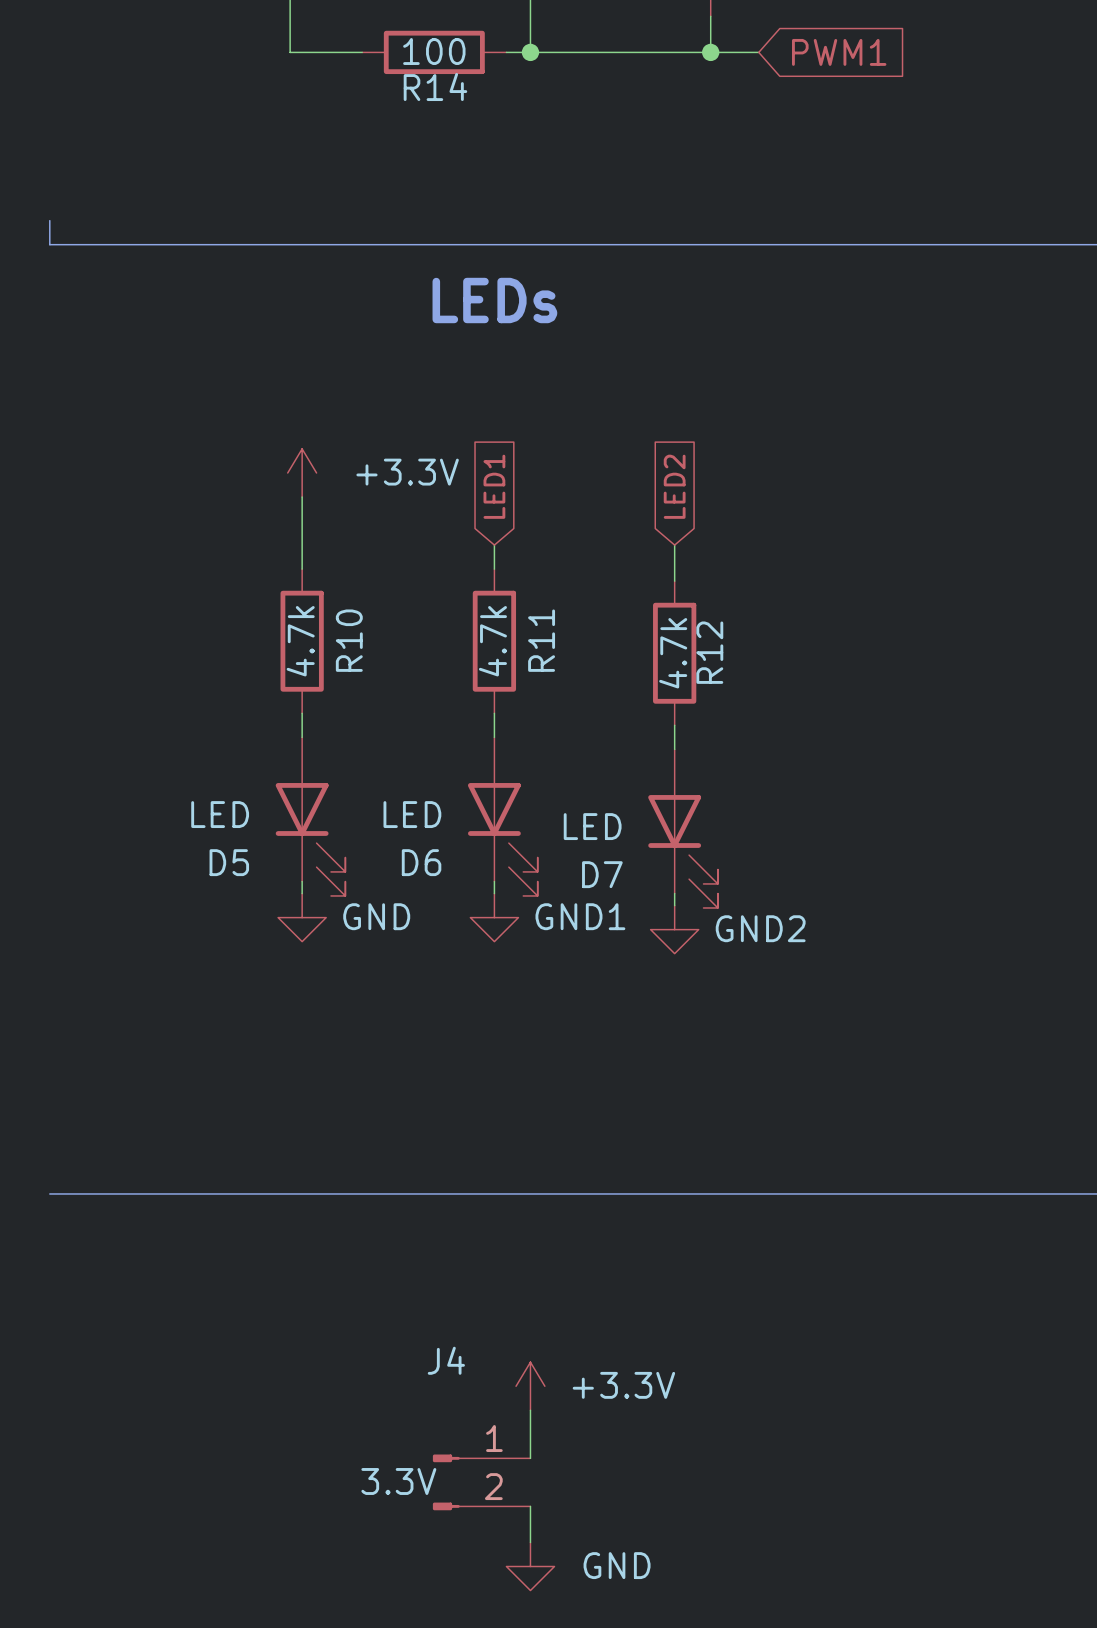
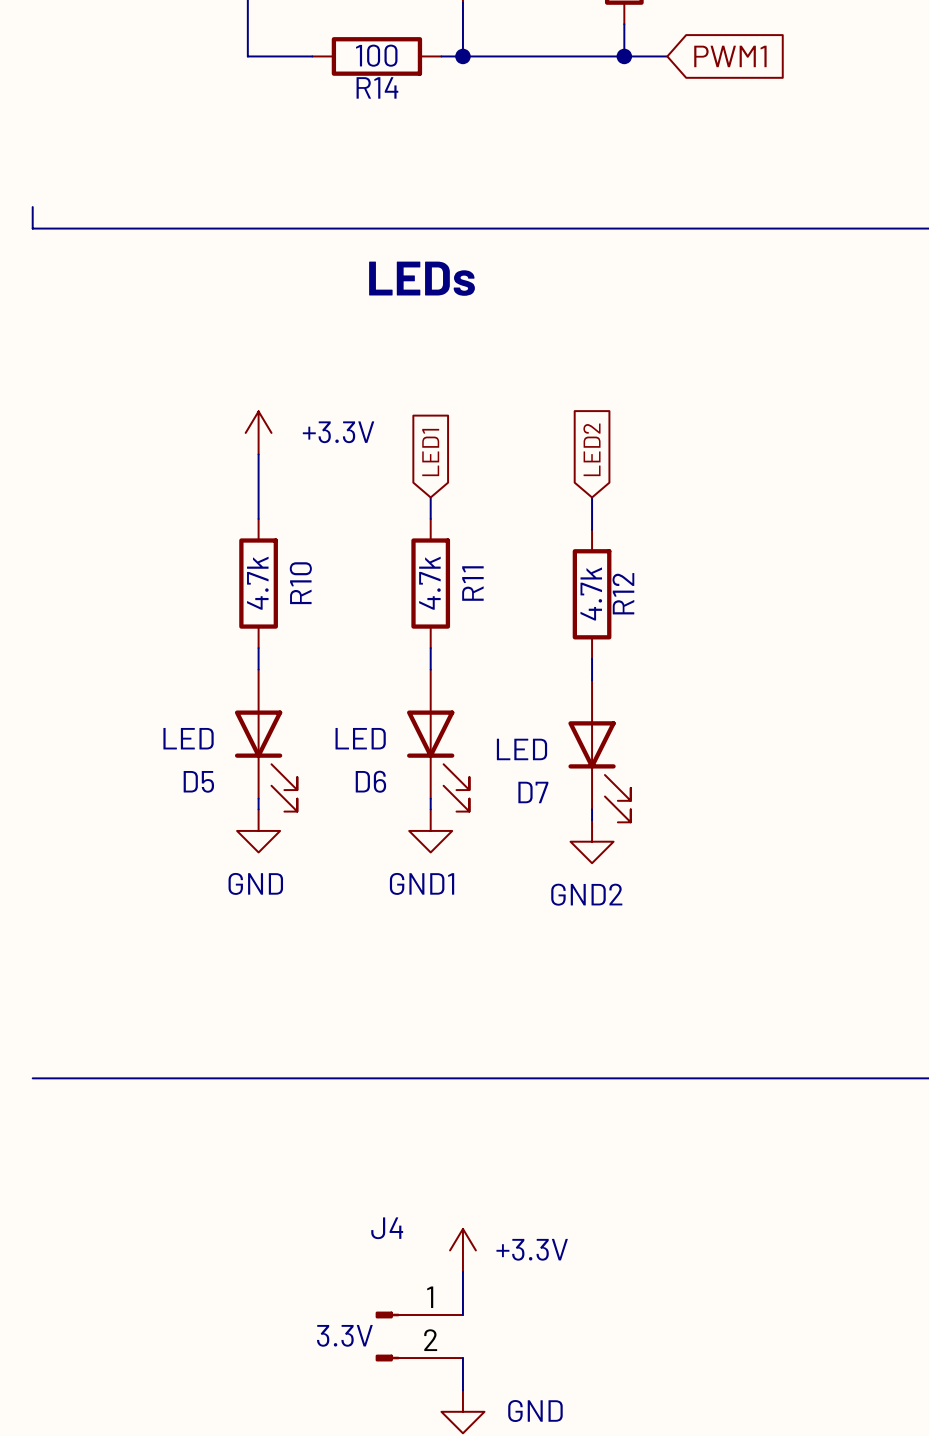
power symbol text position: GND (376, 916) -> GND (255, 883)
power symbol text position: GND1 (580, 916) -> GND1 (422, 883)
power symbol text position: GND2 (760, 928) -> GND2 (586, 894)

